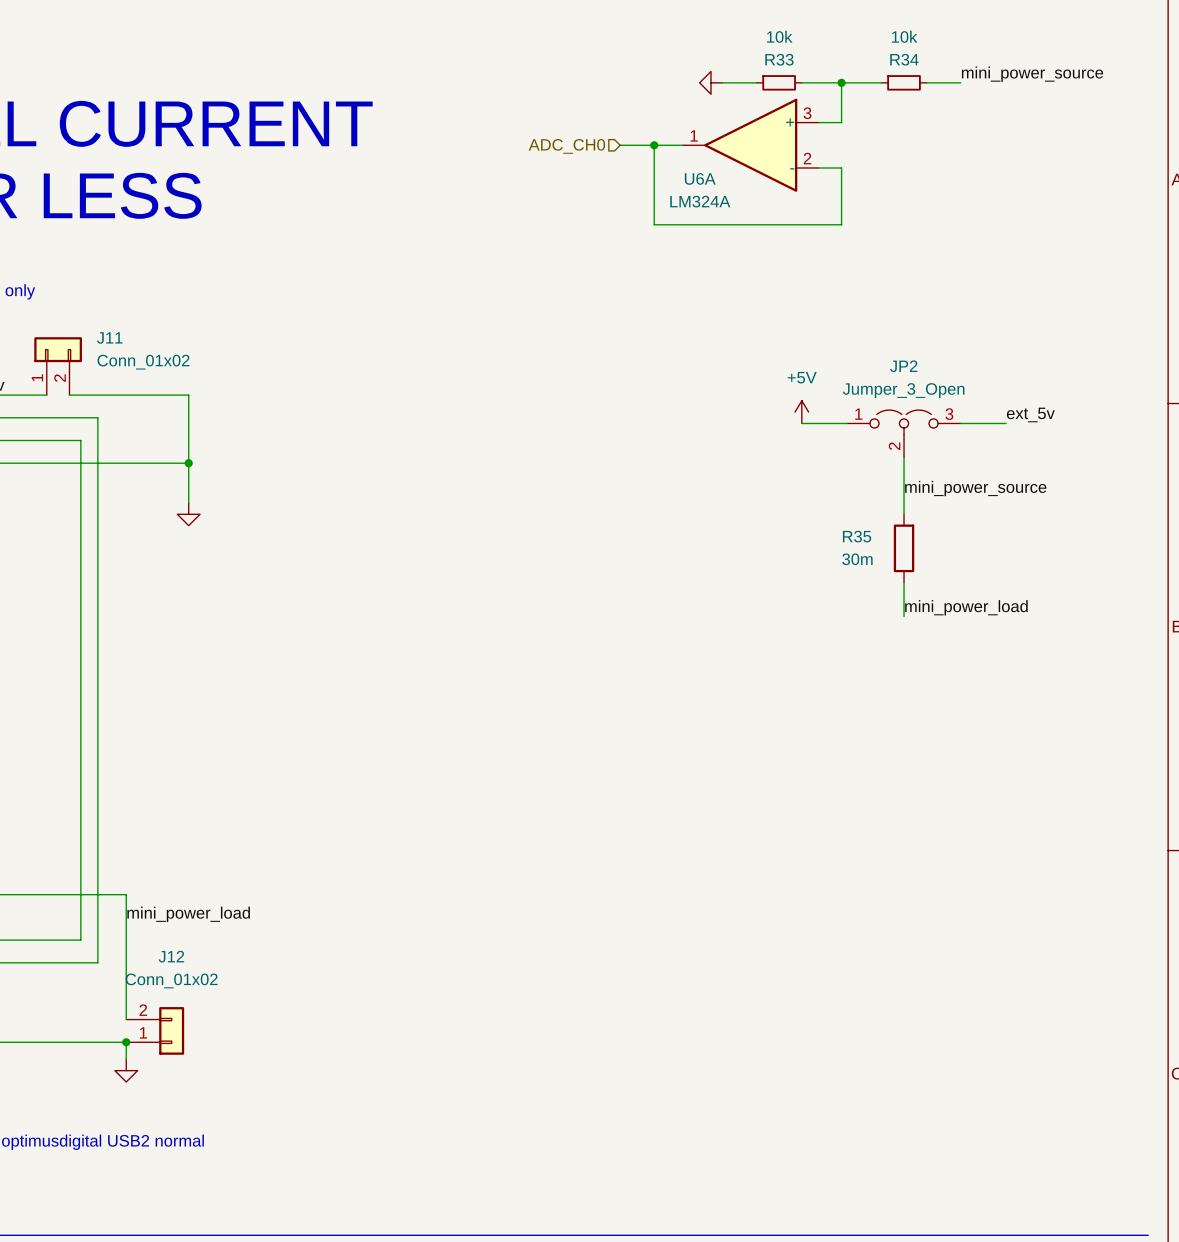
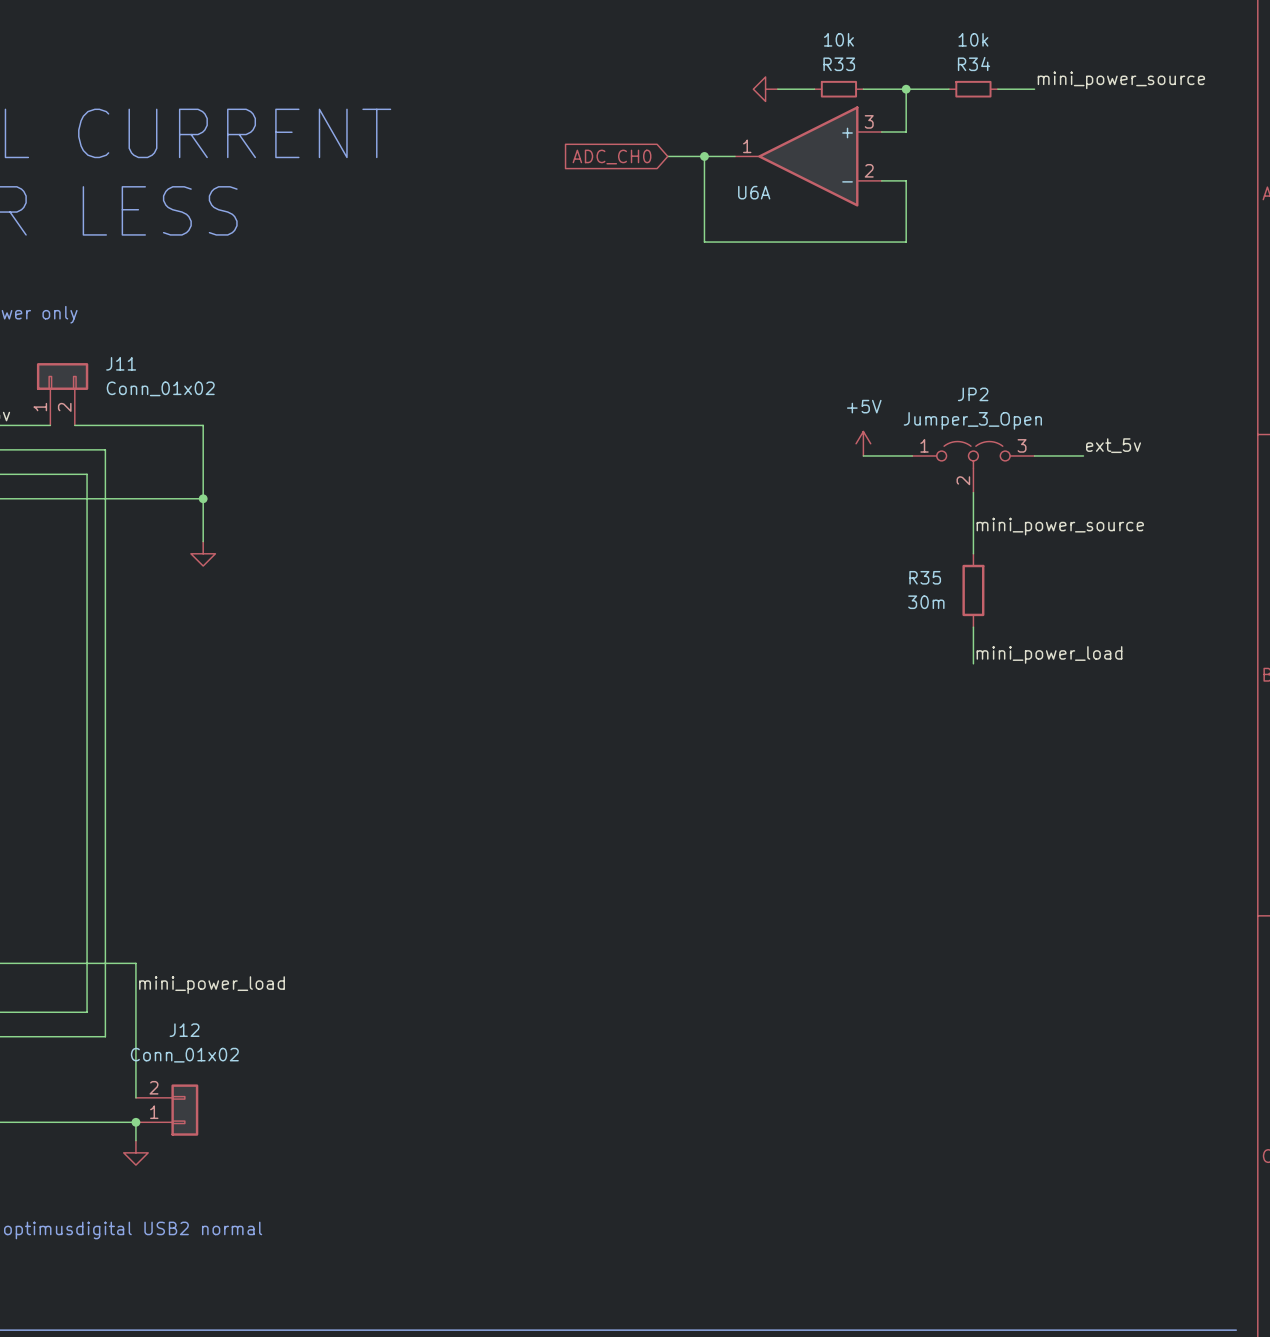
hierarchical label: ADC_CH0 (566, 146) -> none
global label: none -> ADC_CH0 (612, 157)
U6A value: LM324A (700, 201) -> none

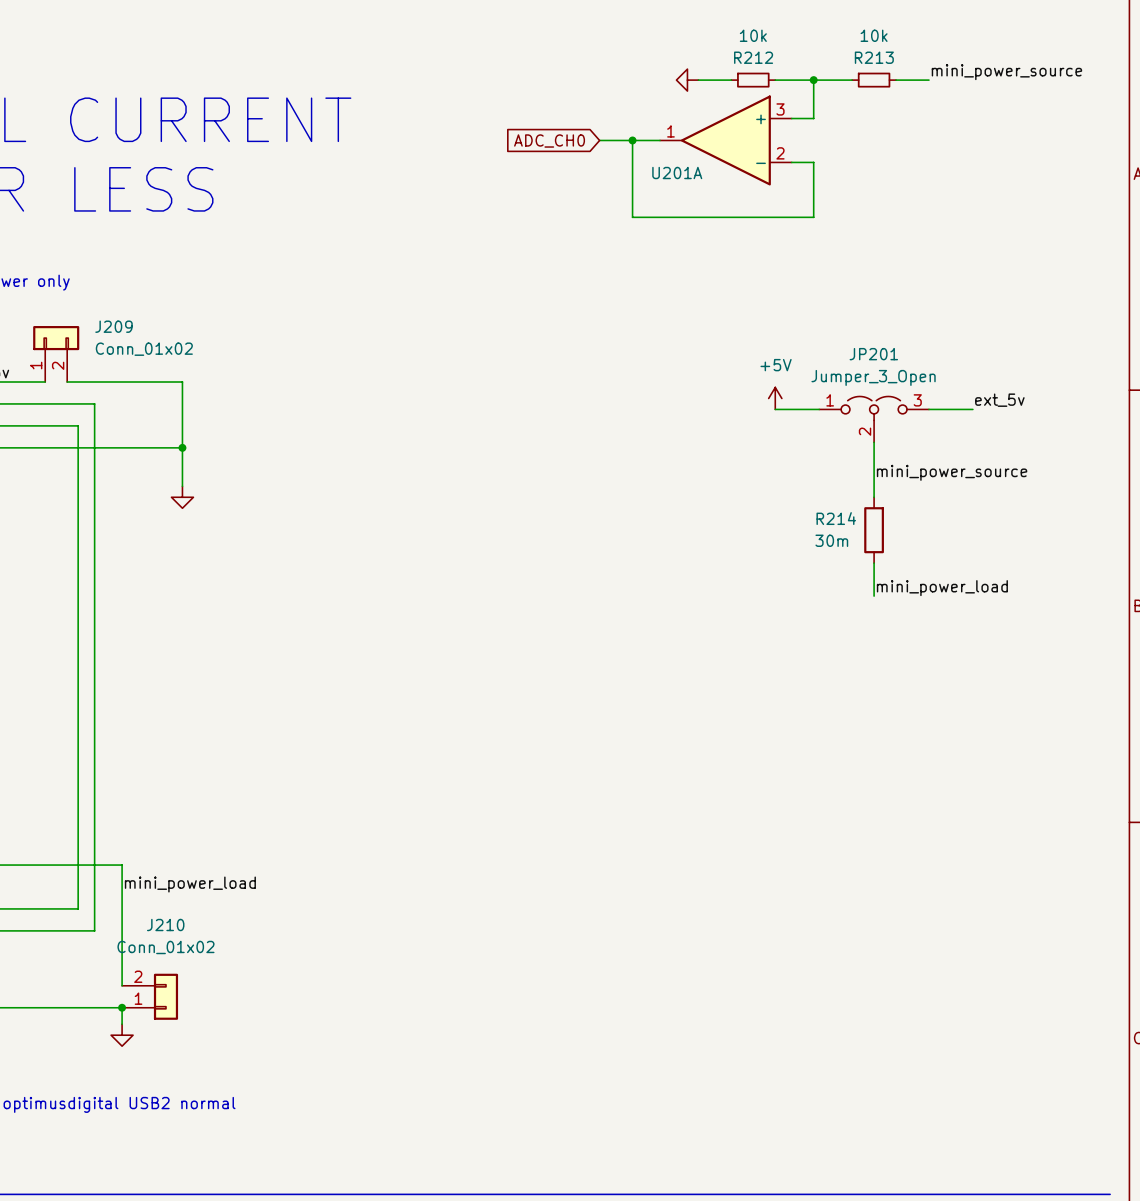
R33 name: R33 (839, 64) -> R212 (753, 57)
R34 name: R34 (974, 64) -> R213 (874, 57)
U6A name: U6A (754, 192) -> U201A (677, 173)
J11 name: J11 (121, 363) -> J209 (114, 326)
JP2 name: JP2 (973, 394) -> JP201 (873, 354)
R35 name: R35 (925, 577) -> R214 (836, 518)
J12 name: J12 (184, 1030) -> J210 (165, 925)

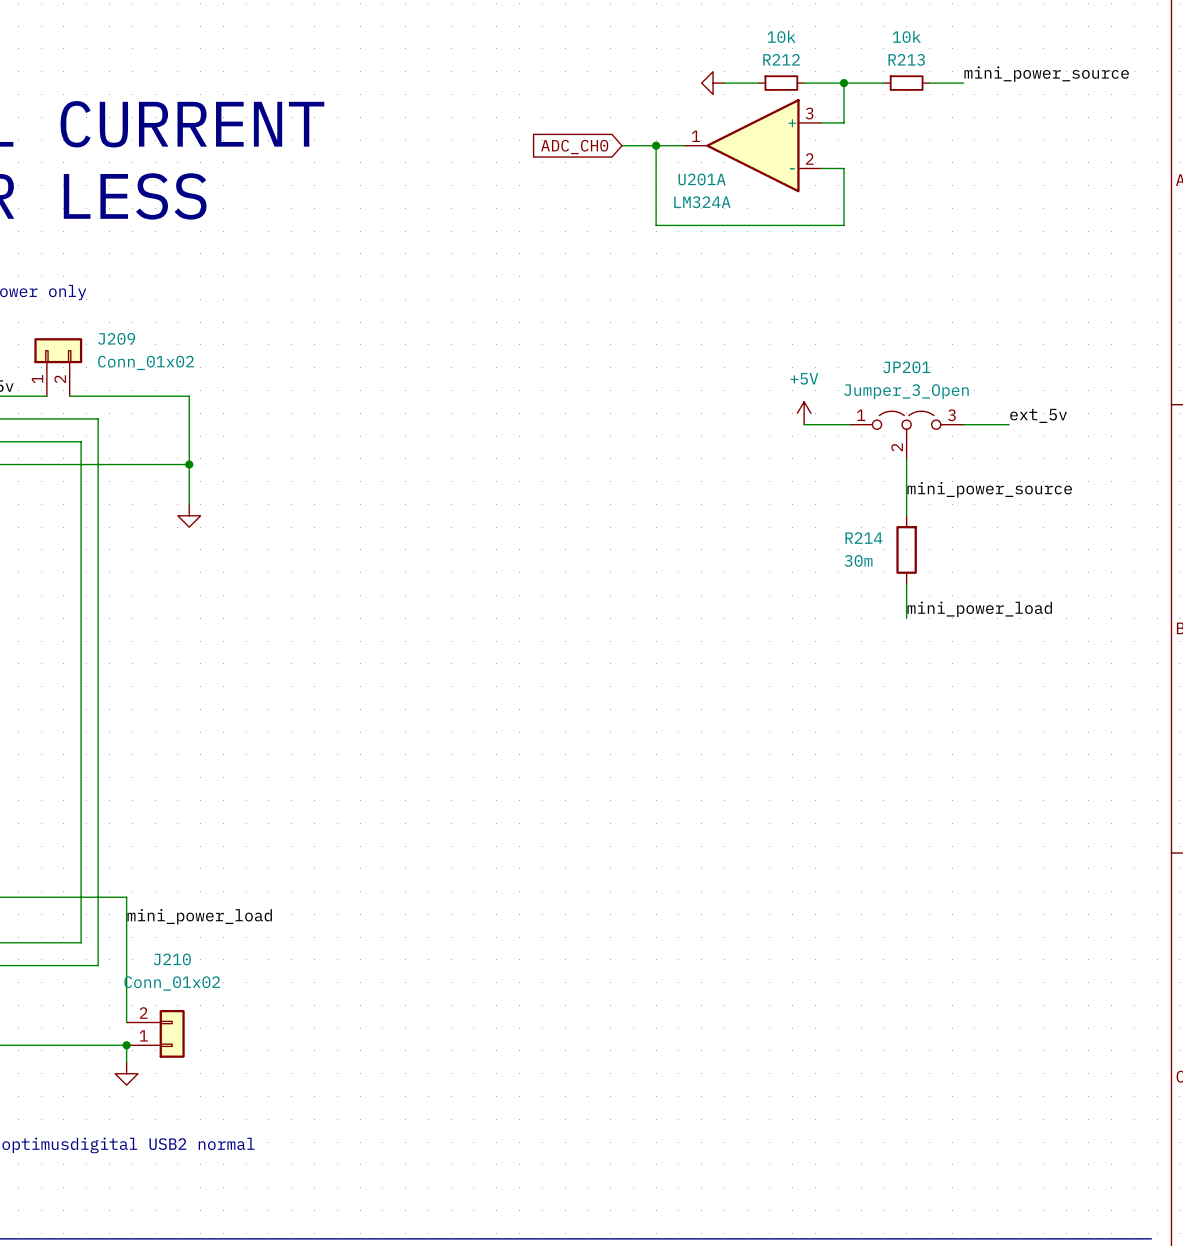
U201A value: none -> LM324A (702, 202)

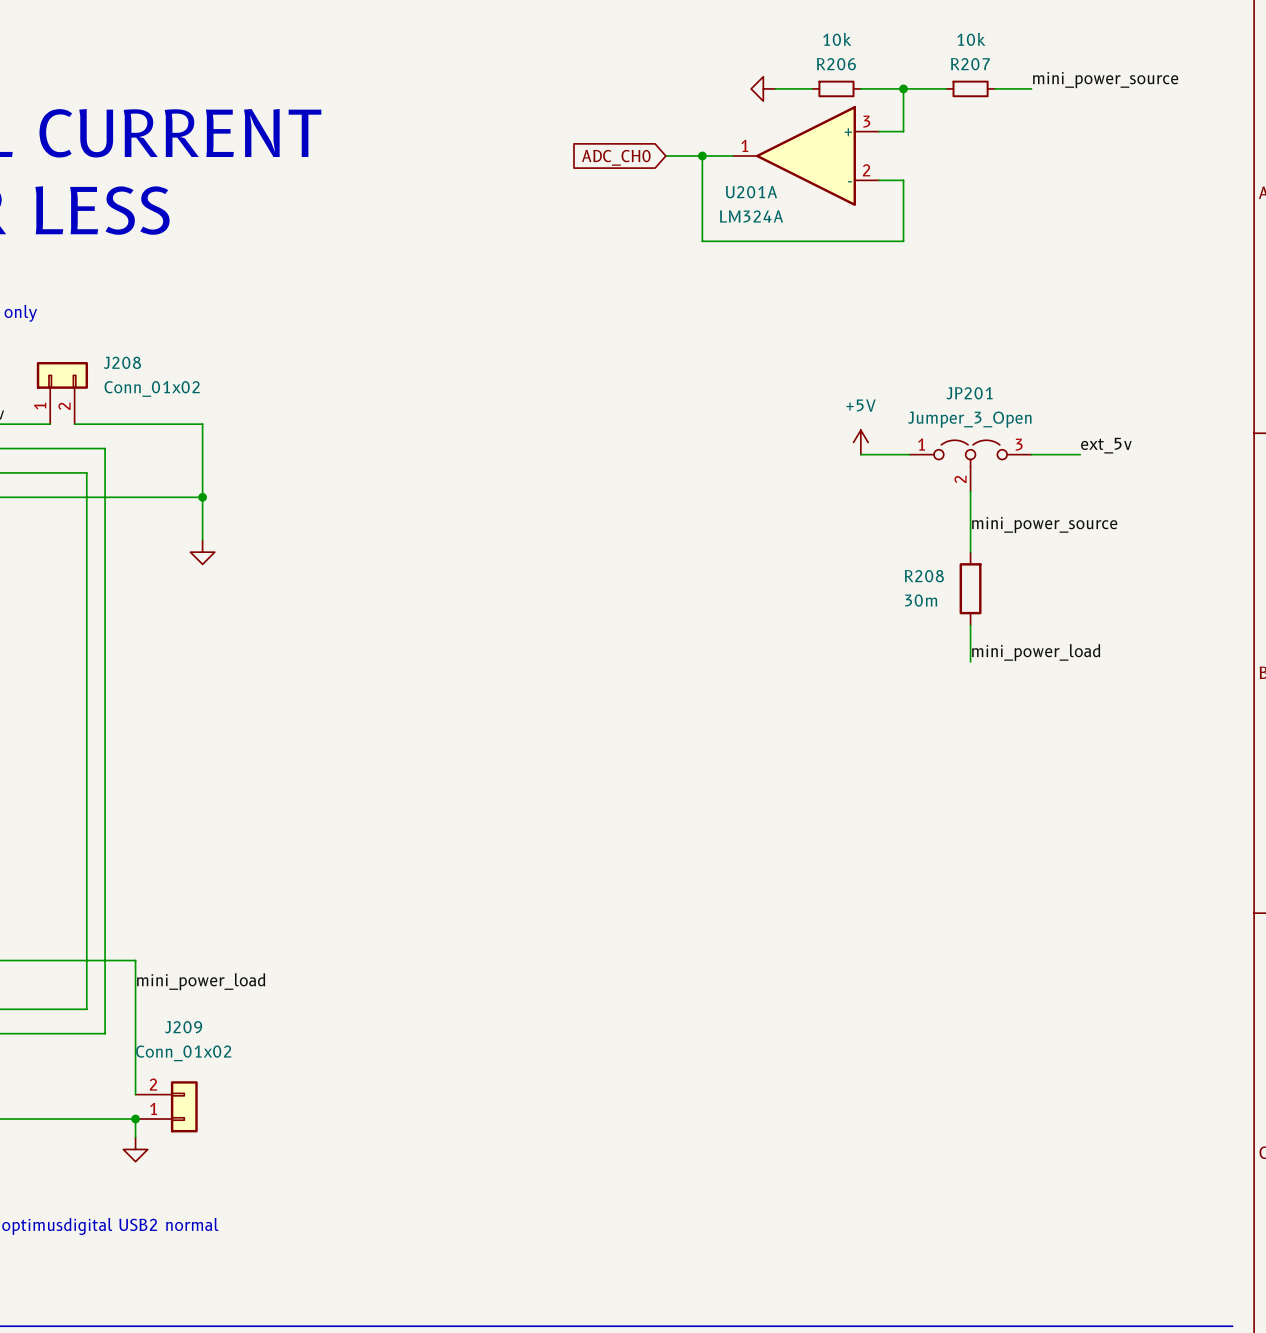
R212 name: R212 (781, 59) -> R206 (836, 64)
R213 name: R213 (906, 59) -> R207 (970, 64)
J209 name: J209 (116, 338) -> J208 (122, 362)
R214 name: R214 (864, 538) -> R208 (924, 576)
J210 name: J210 (172, 959) -> J209 (183, 1027)

